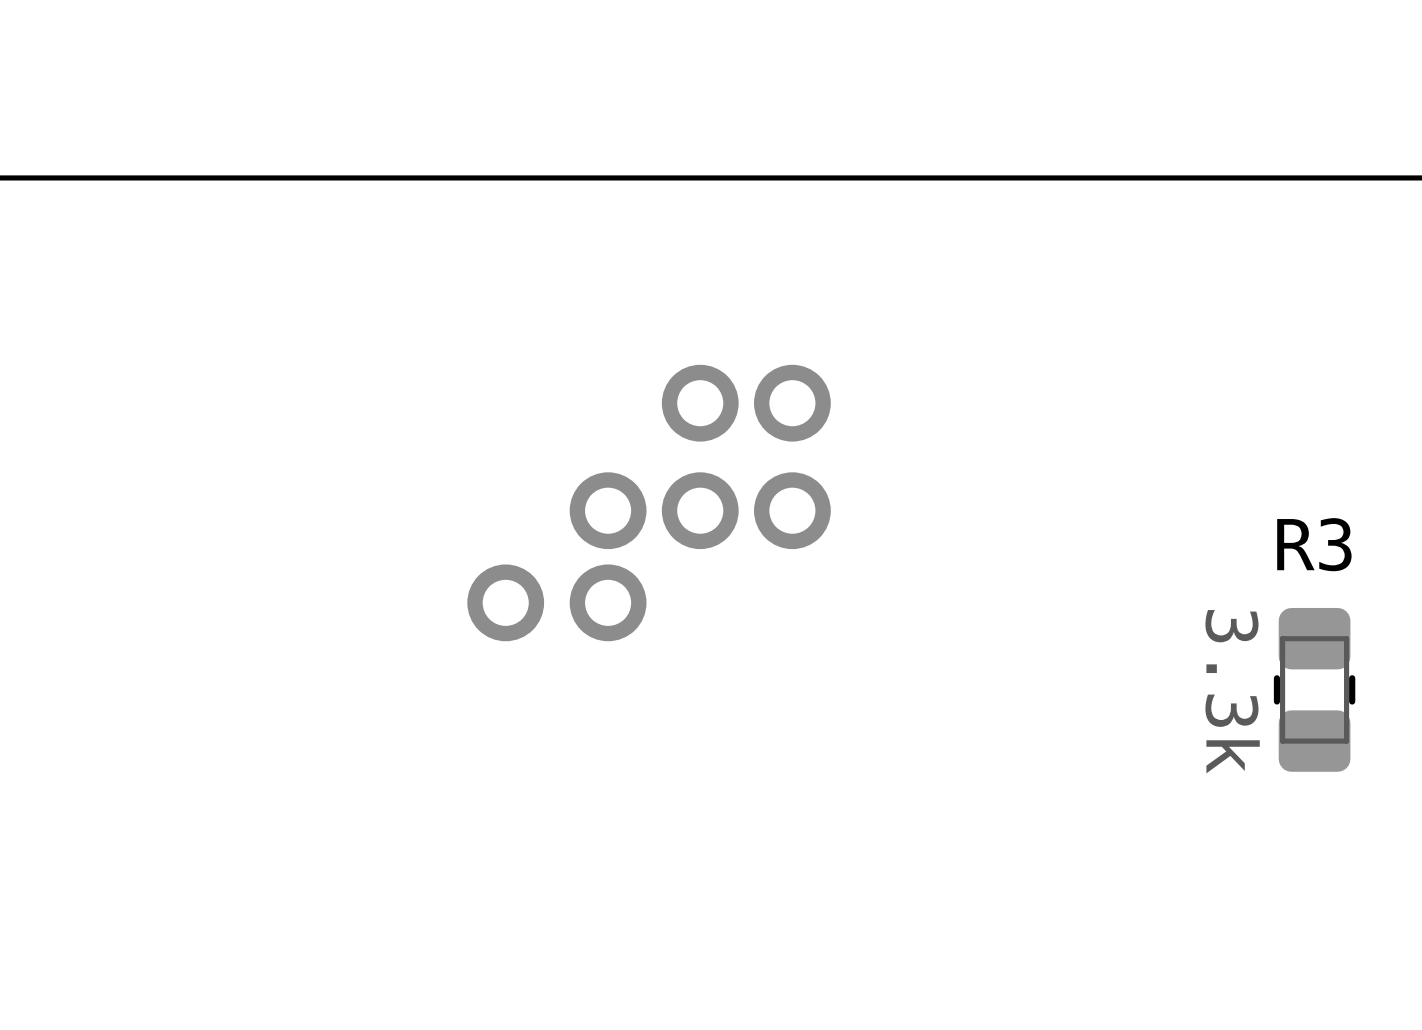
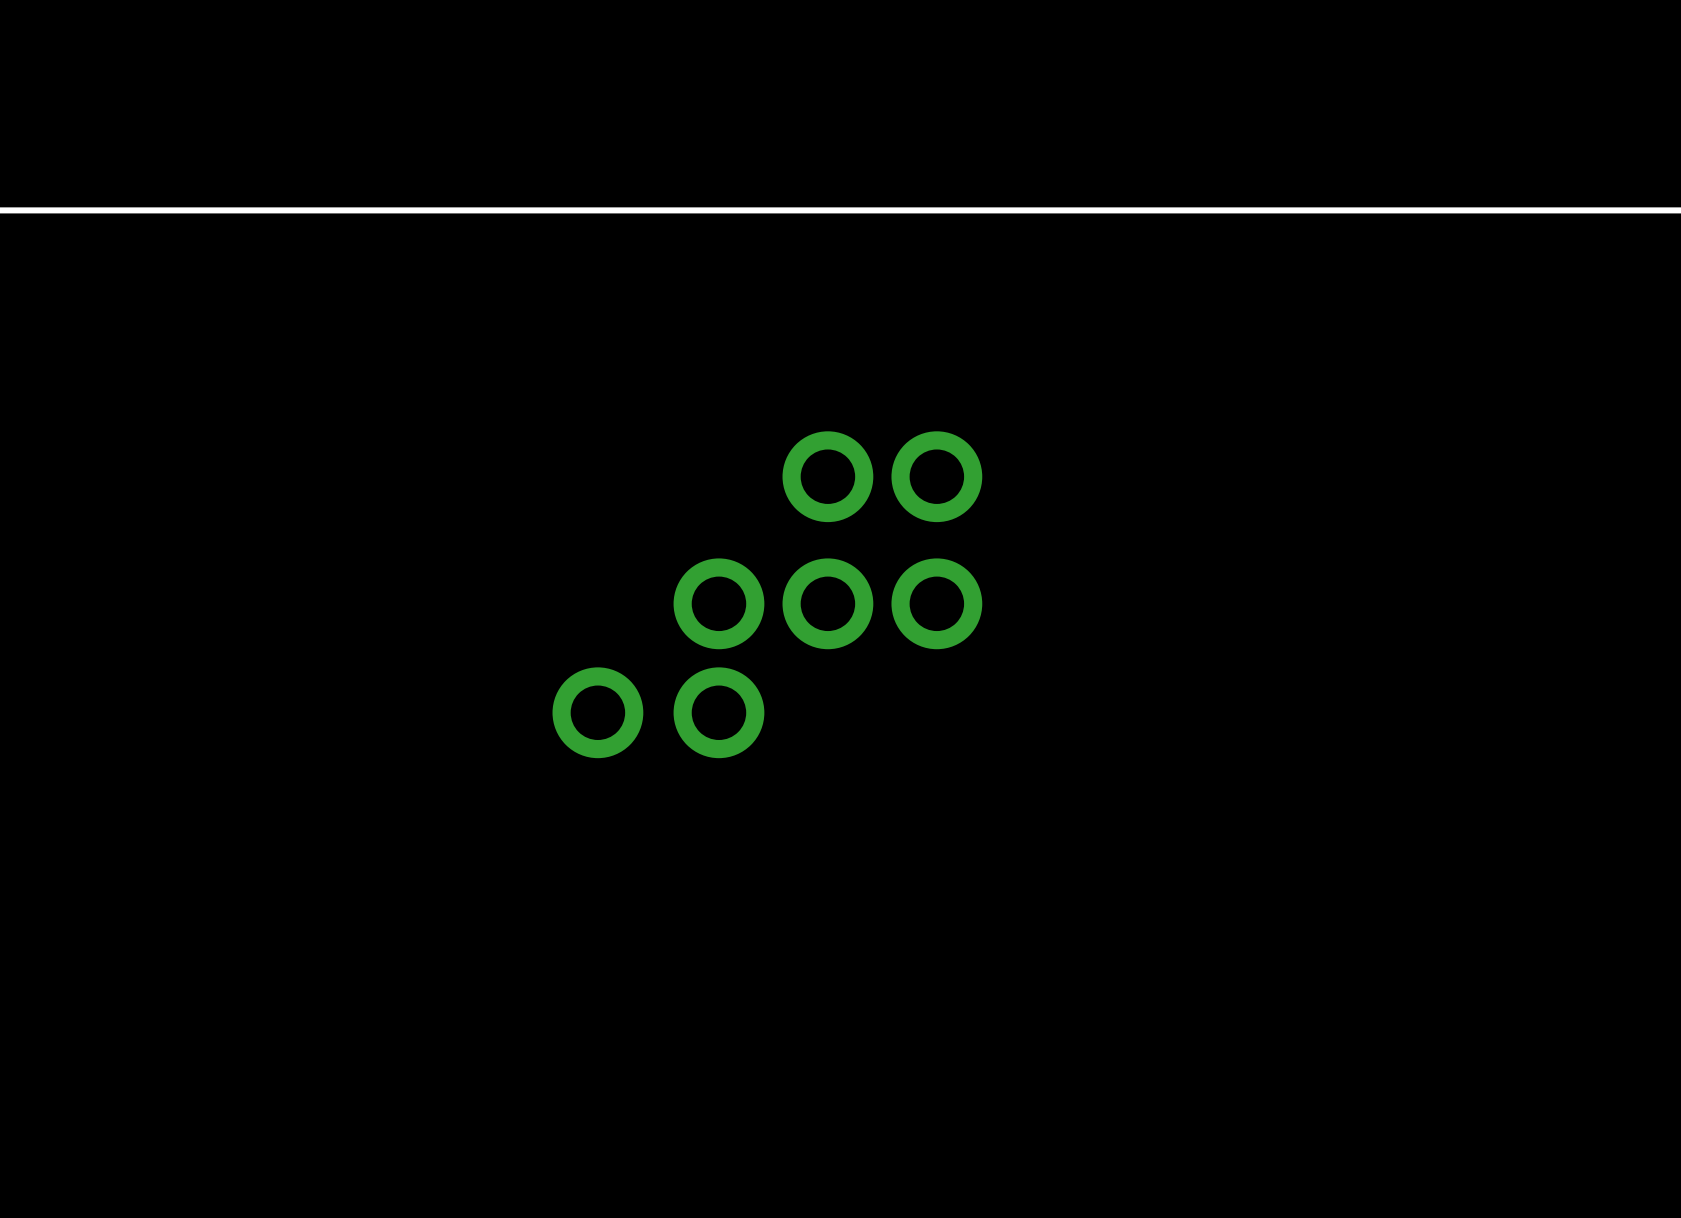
R3: 3.3k (1314, 689) -> none

